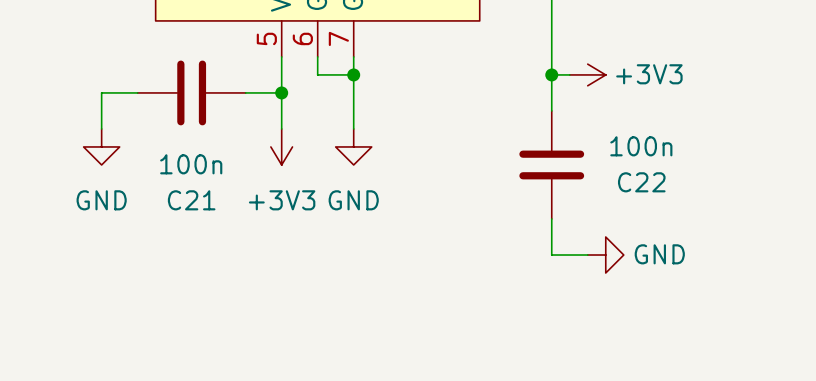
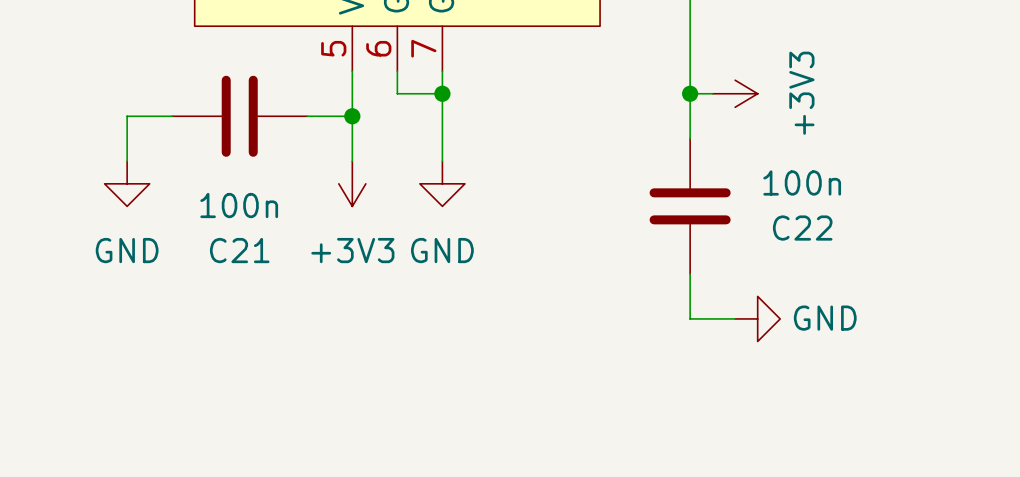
power symbol text rotation: 0° (649, 74) -> 90° counterclockwise (801, 93)

